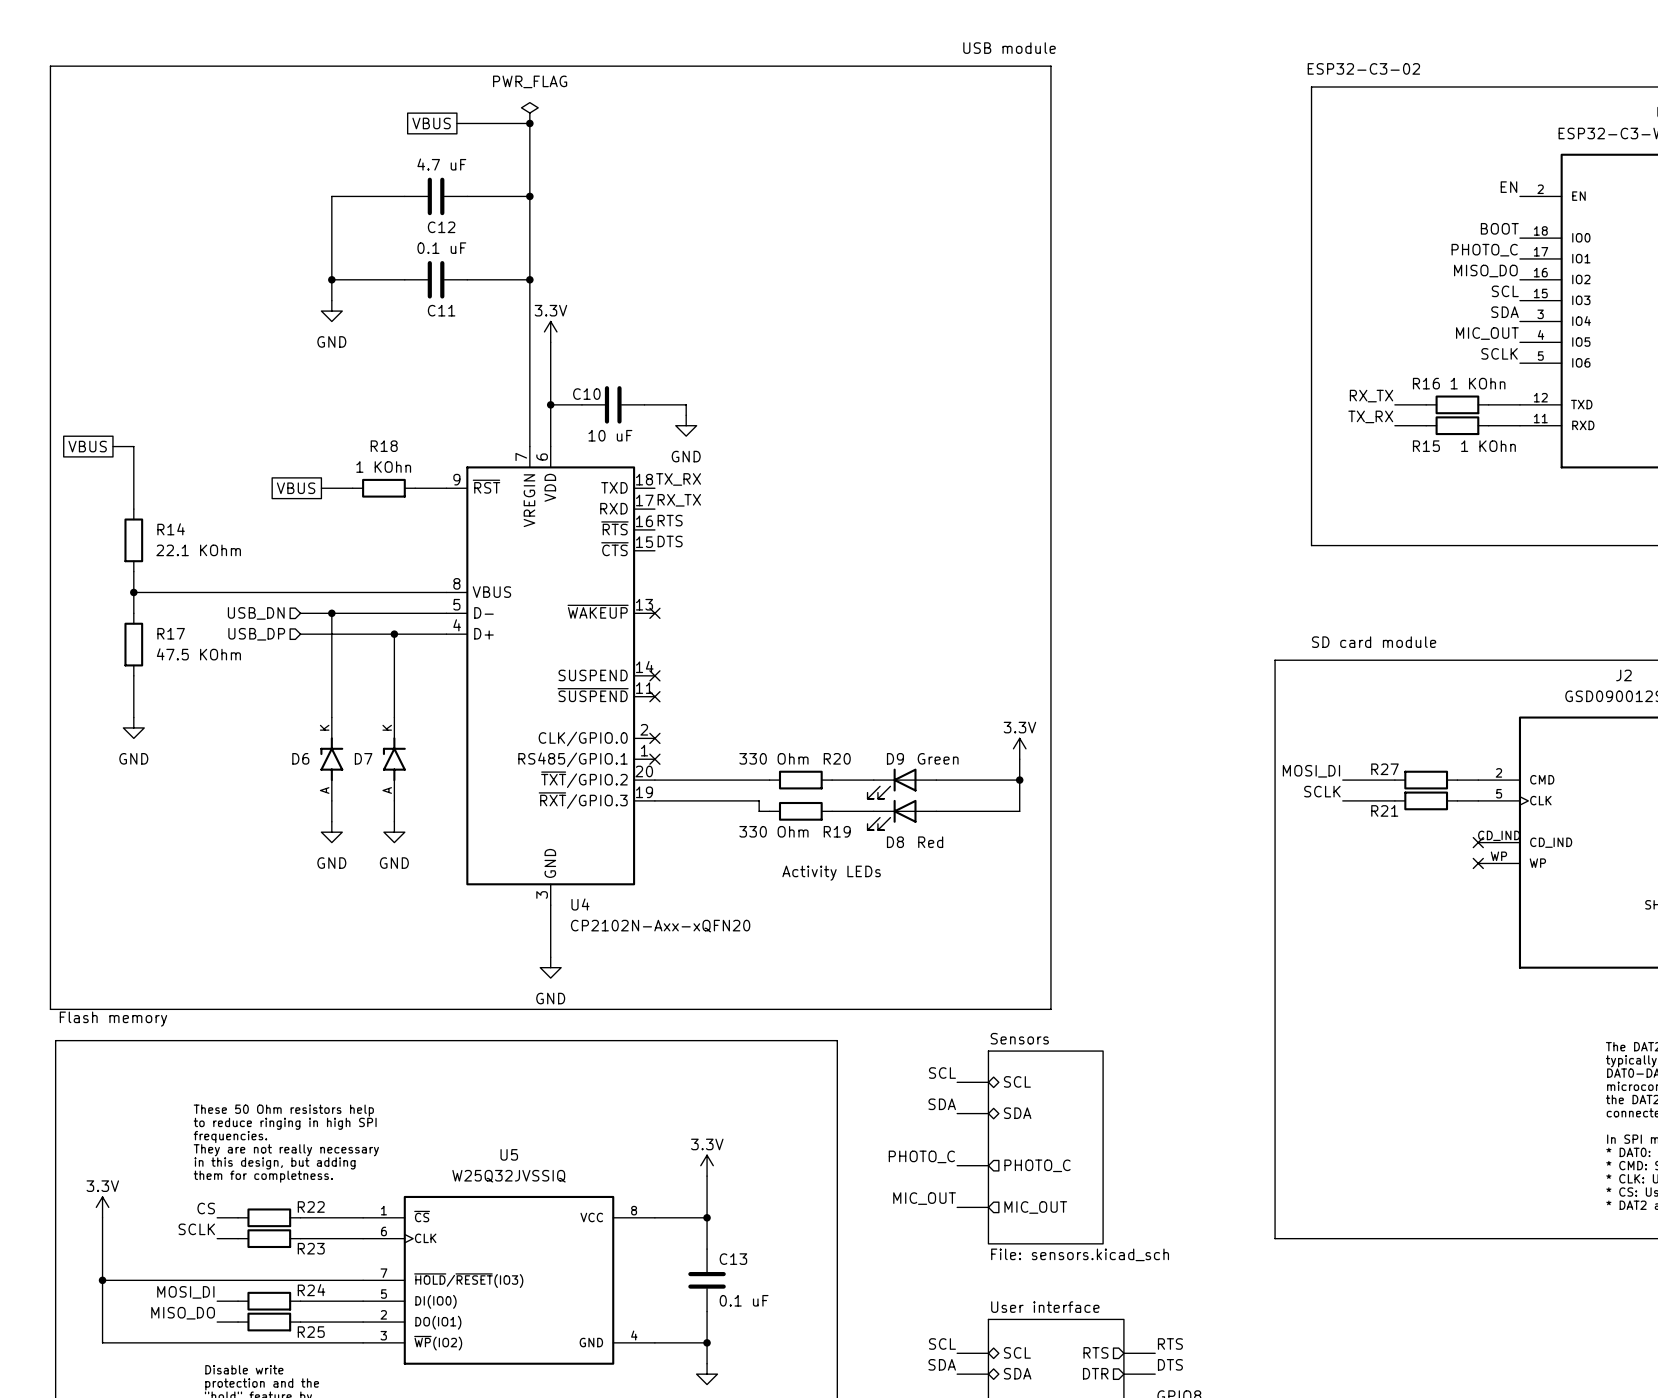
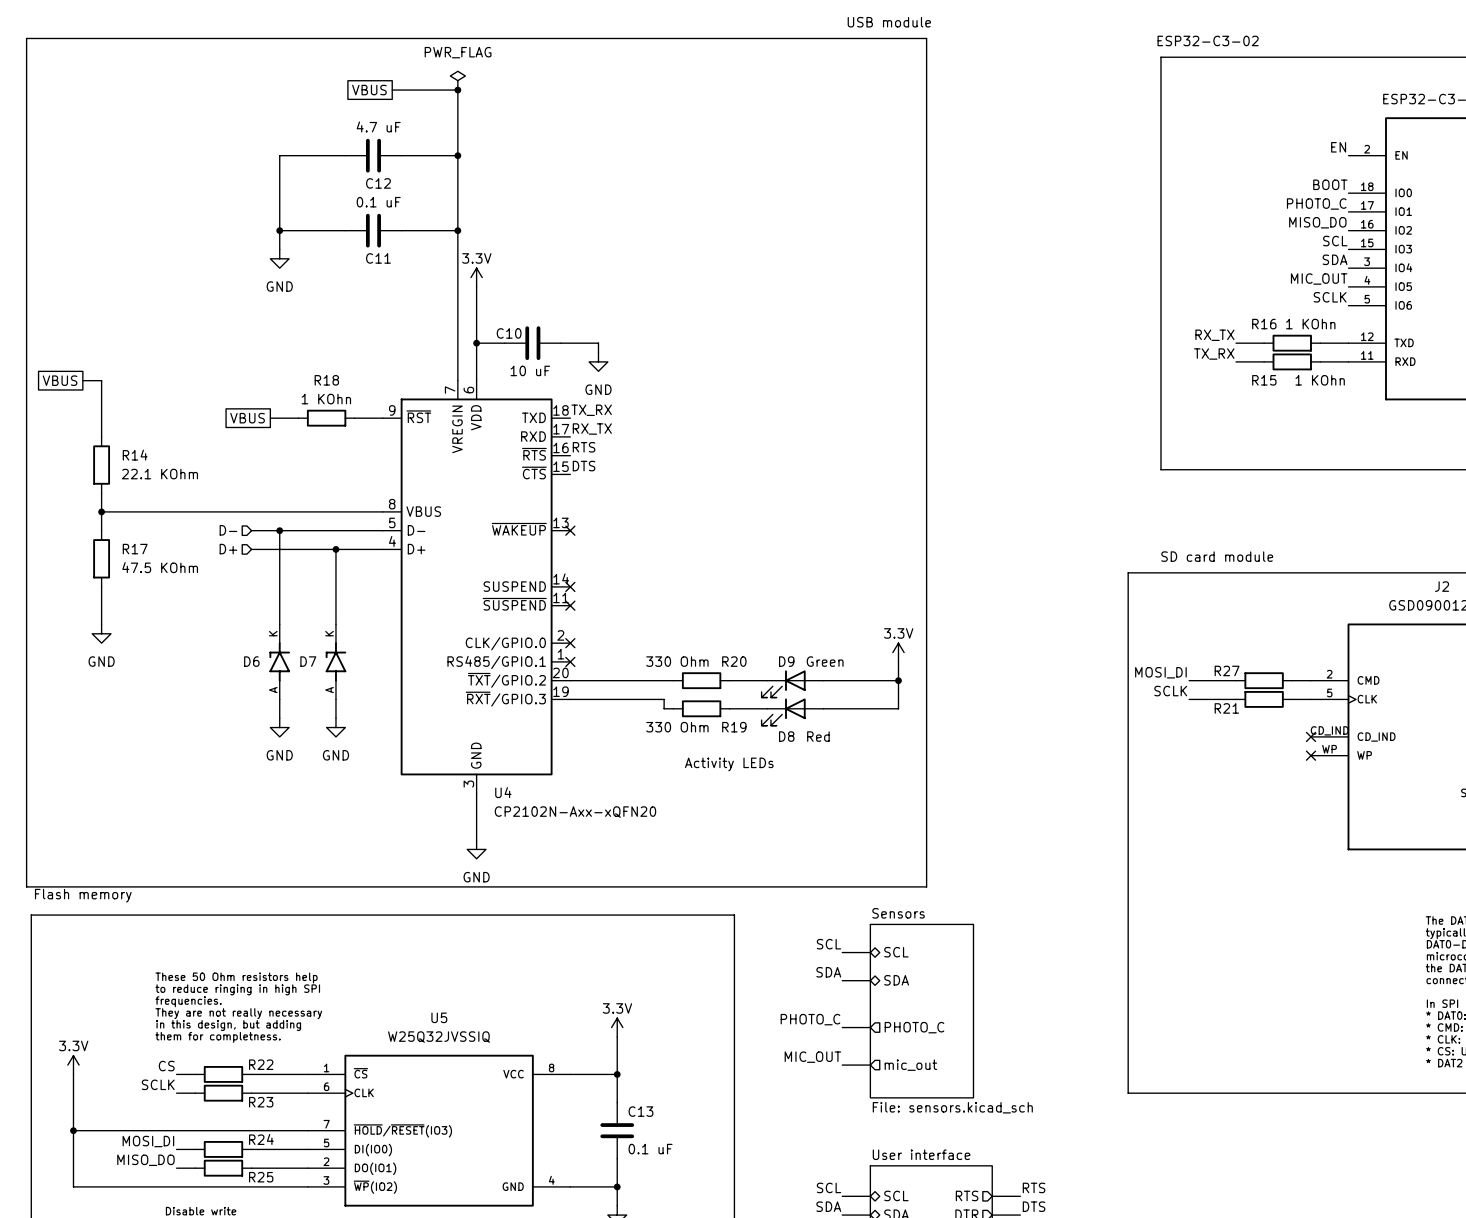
hierarchical label: USB_DN (256, 613) -> D- (228, 530)
hierarchical label: USB_DP (256, 634) -> D+ (228, 549)
sheet pin: MIC_OUT (1035, 1207) -> mic_out (910, 1065)

